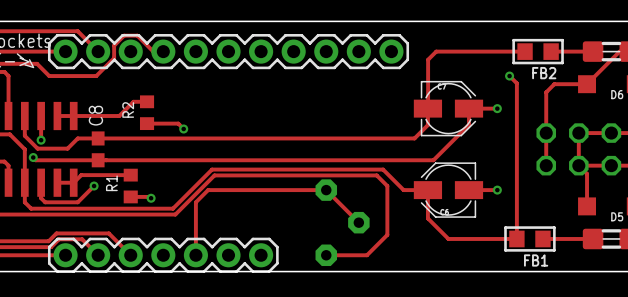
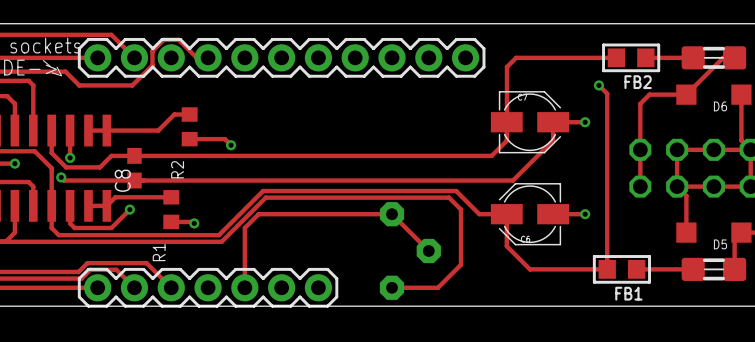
R2 name position: R2 (128, 109) -> R2 (177, 169)
C8 name position: C8 (95, 115) -> C8 (122, 180)
R1 name position: R1 (111, 183) -> R1 (159, 252)

